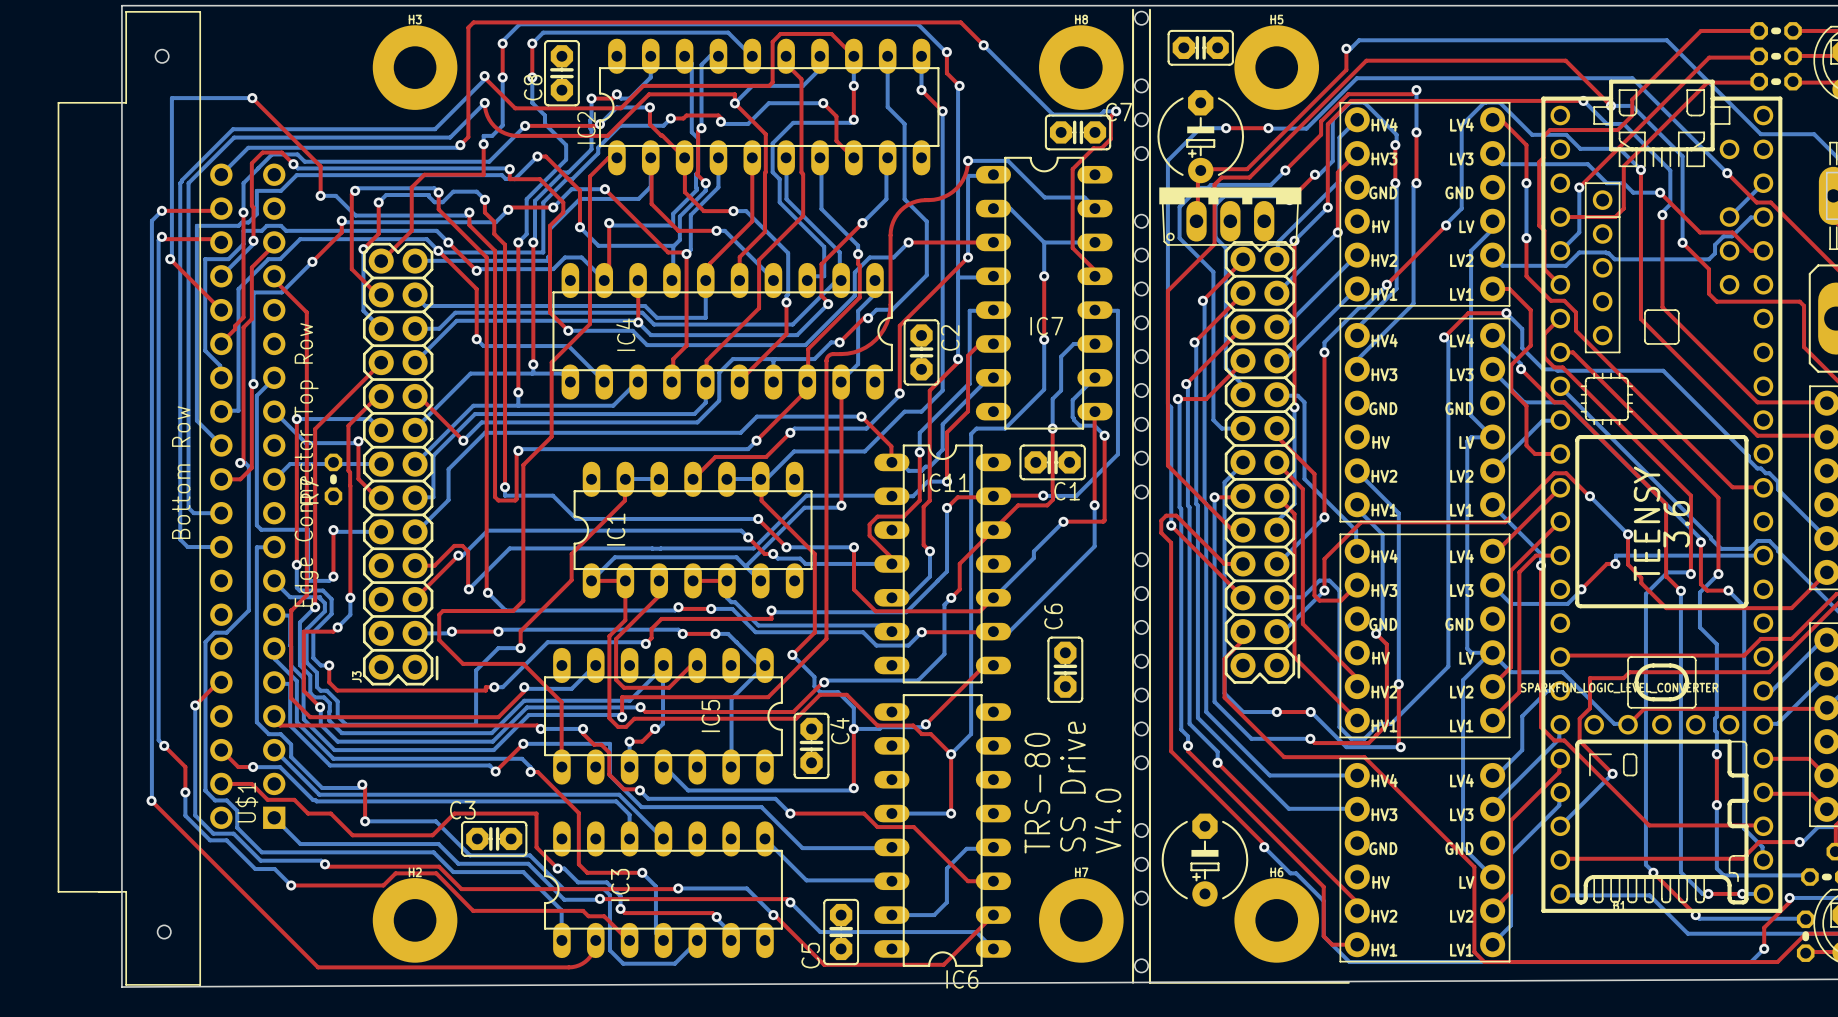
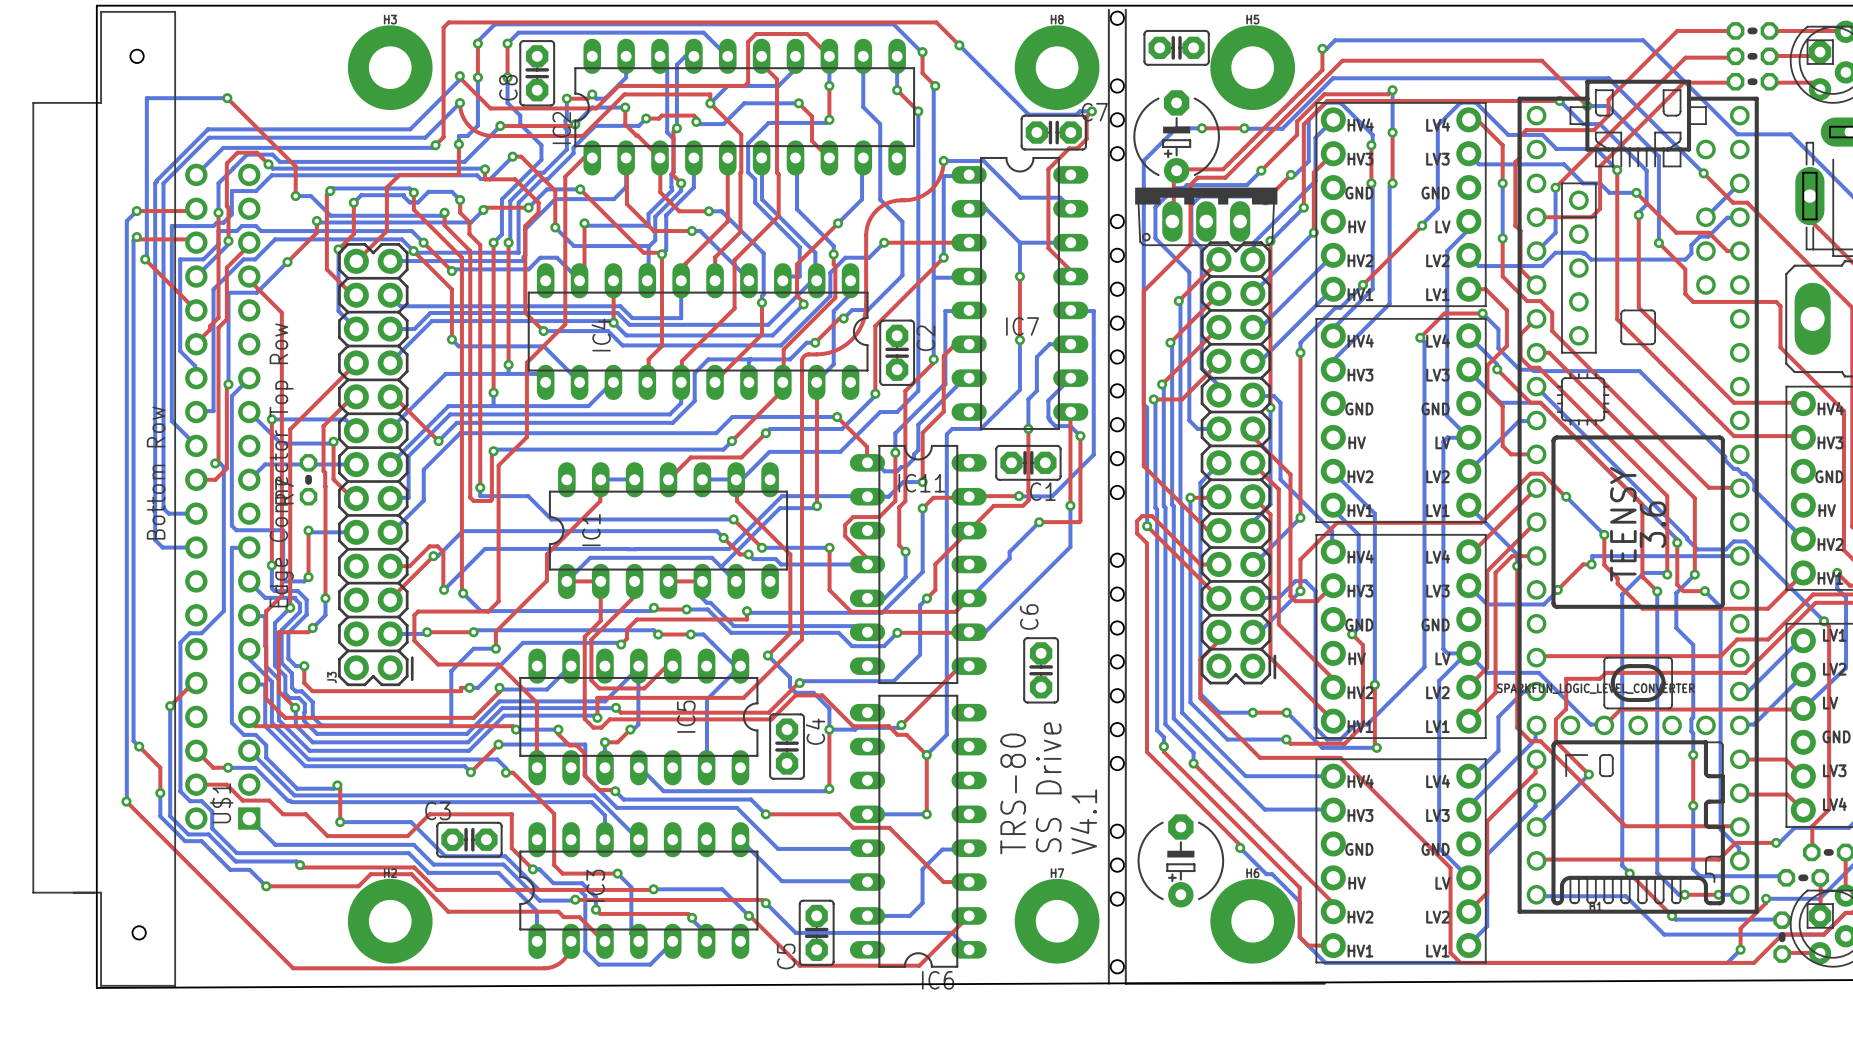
text: V4.0 (1107, 821) -> V4.1 (1083, 821)

